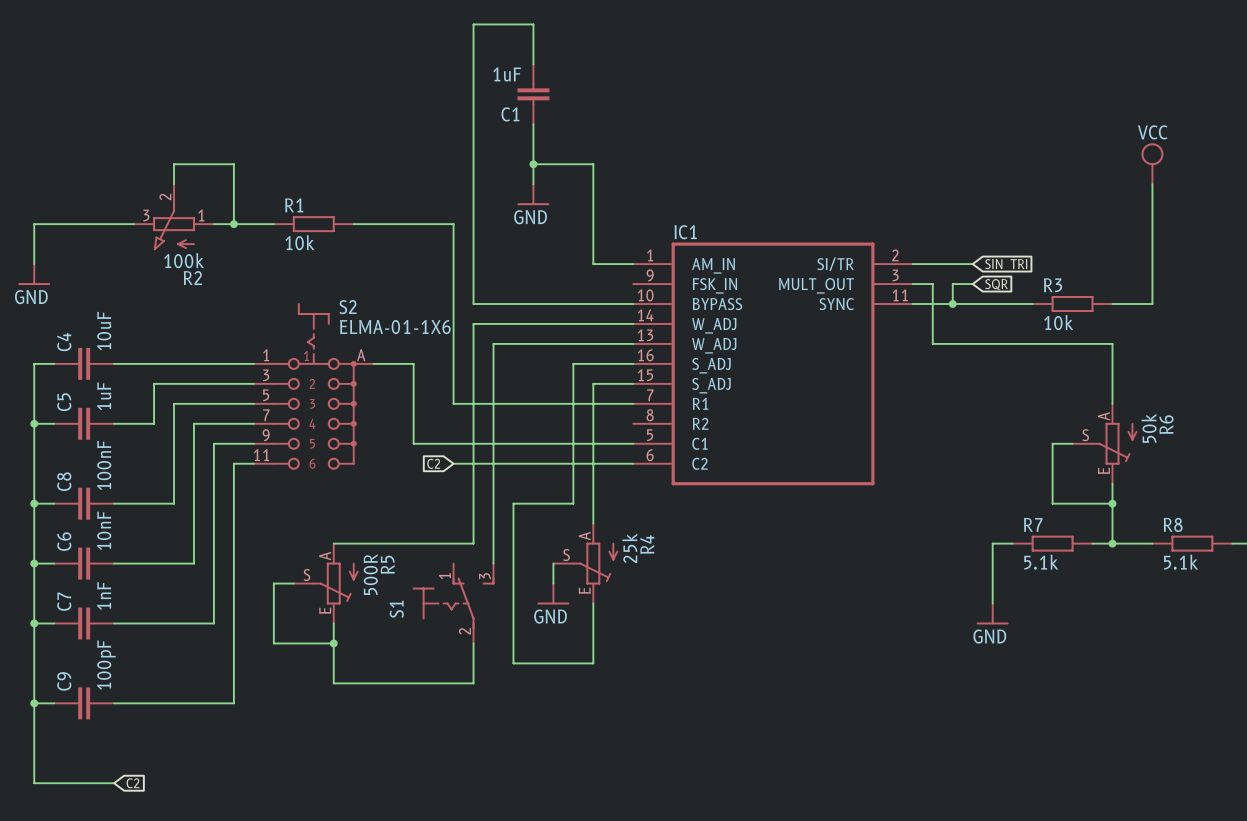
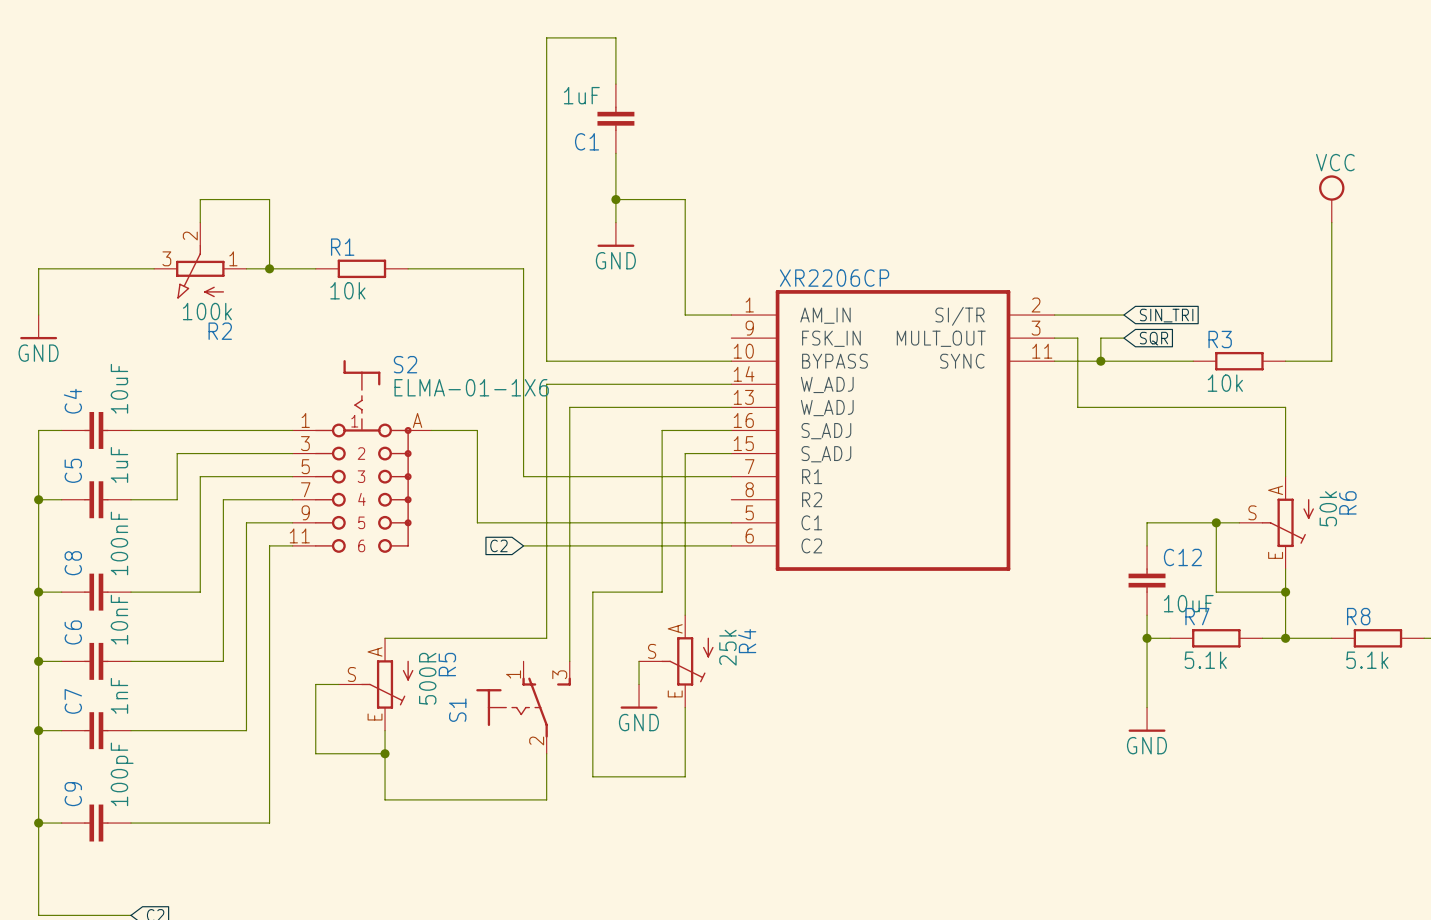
IC1 name: IC1 (685, 232) -> XR2206CP (834, 278)
wire: none -> (1216, 522) (1147, 522) (1147, 545)
junction: none -> (1216, 522)
C12: none -> 10uF (1147, 580)
wire: none -> (1147, 615) (1147, 638)
junction: none -> (1147, 638)

